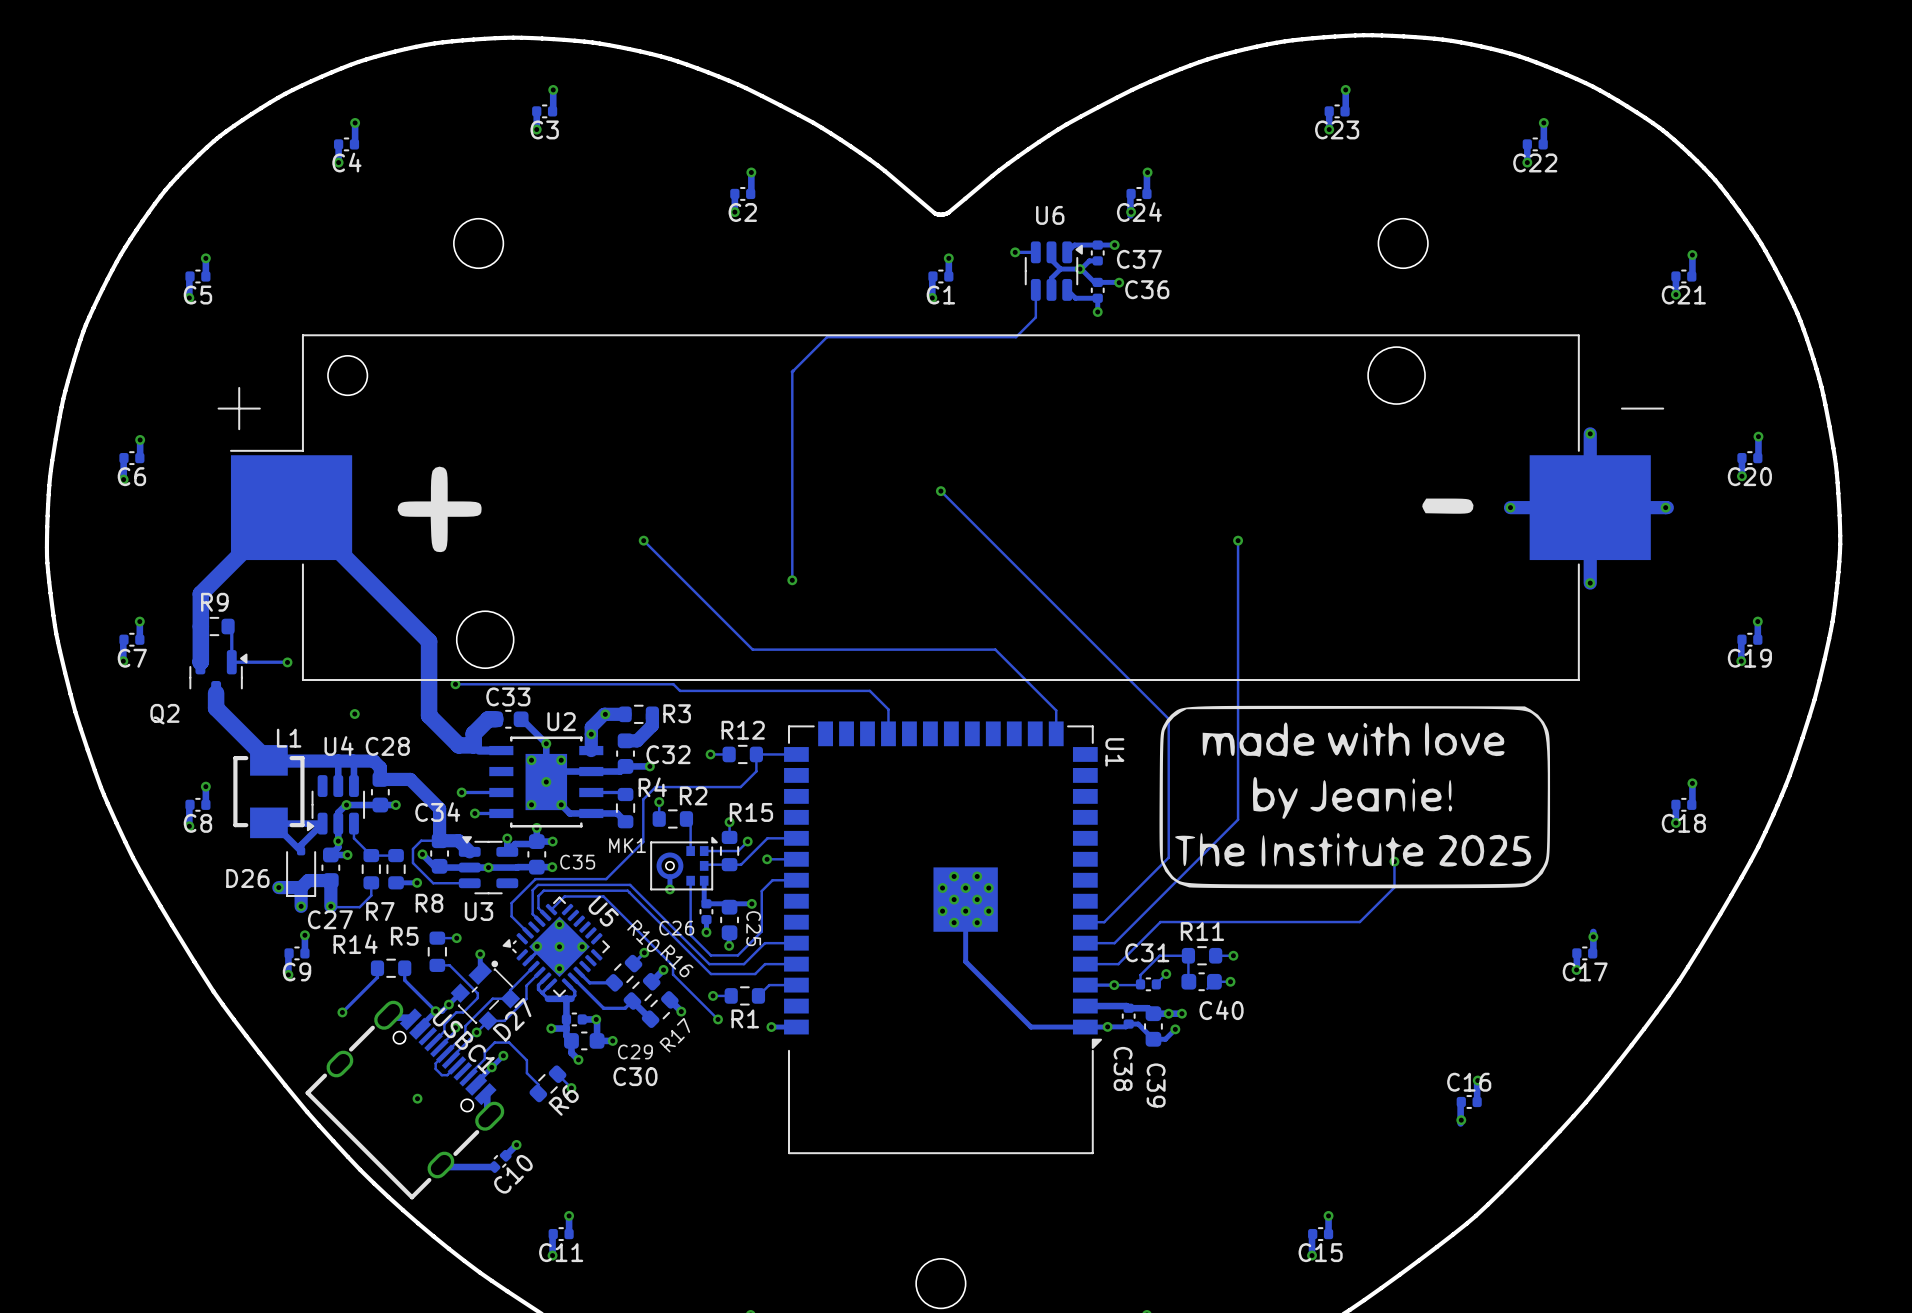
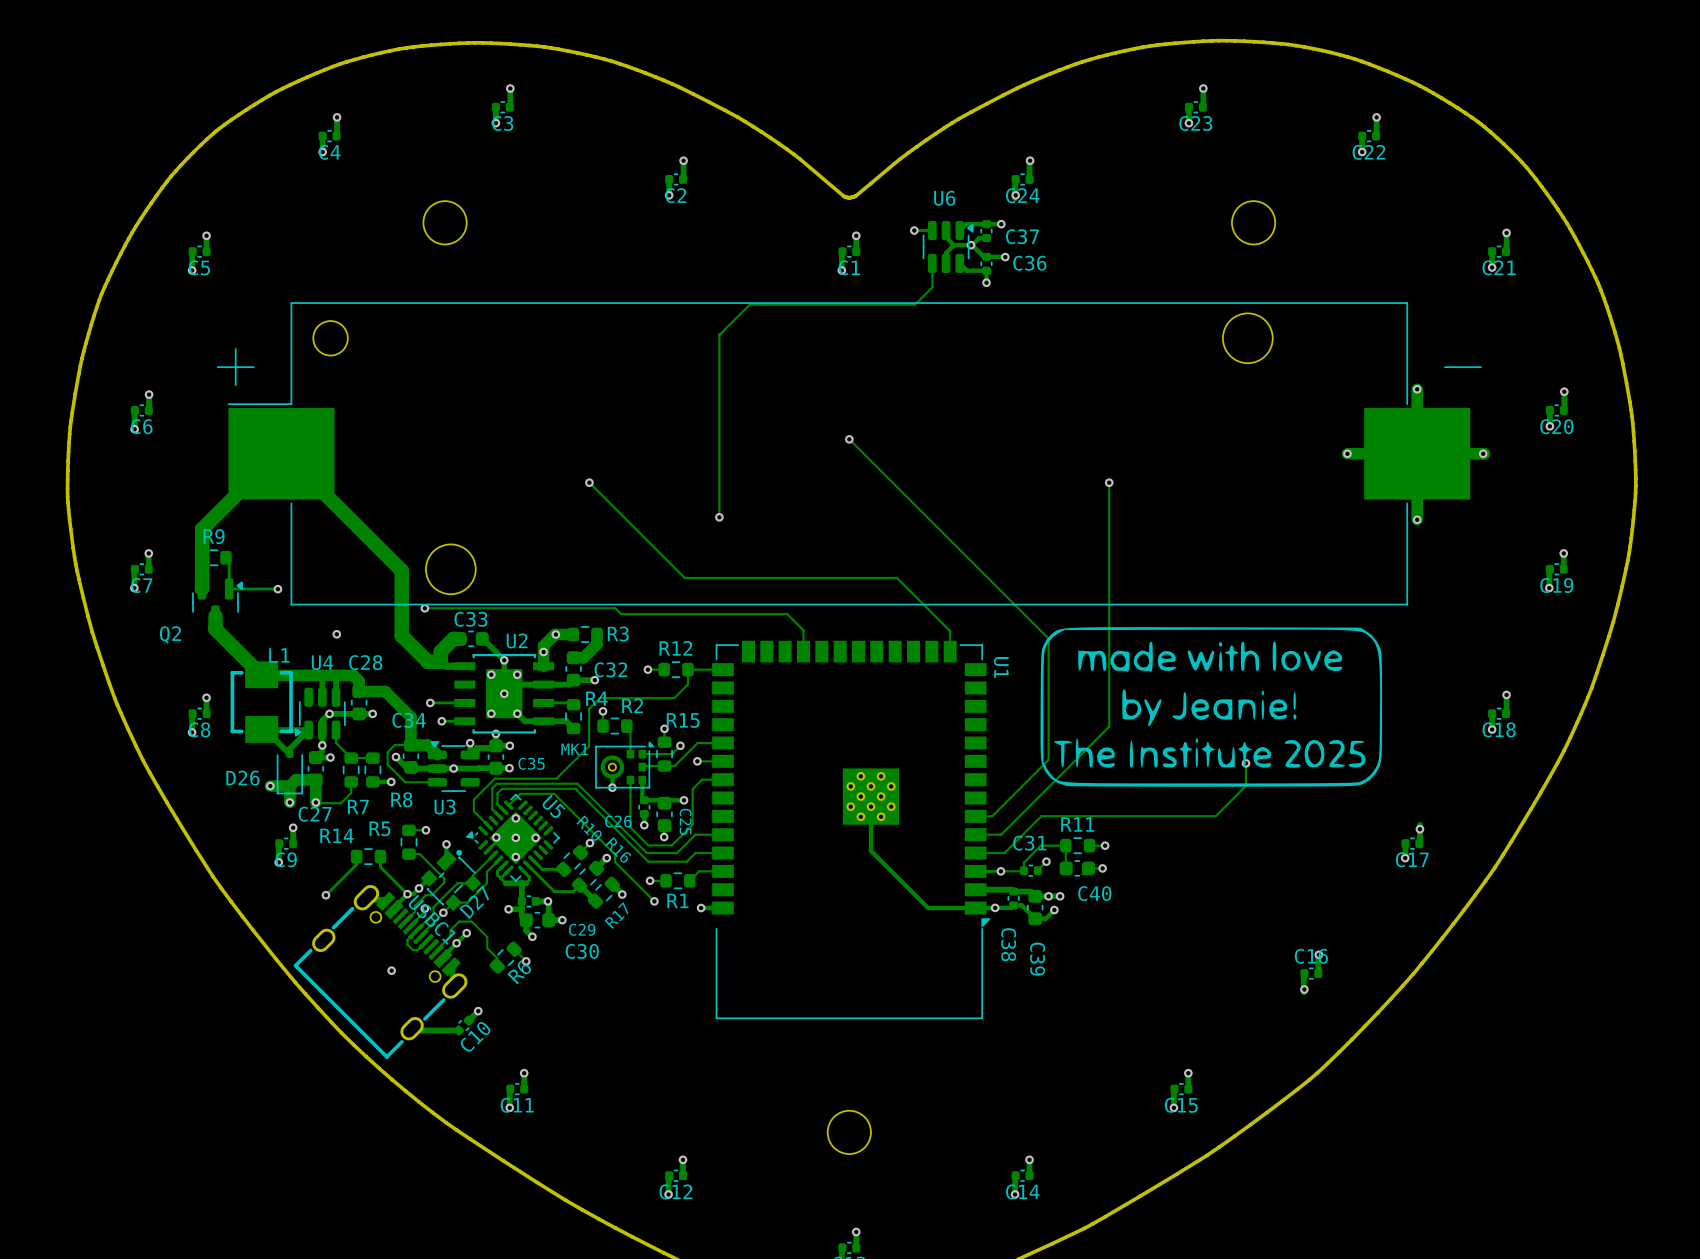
drawing: [397, 466, 482, 553] -> none
drawing: [1422, 498, 1474, 514] -> none

